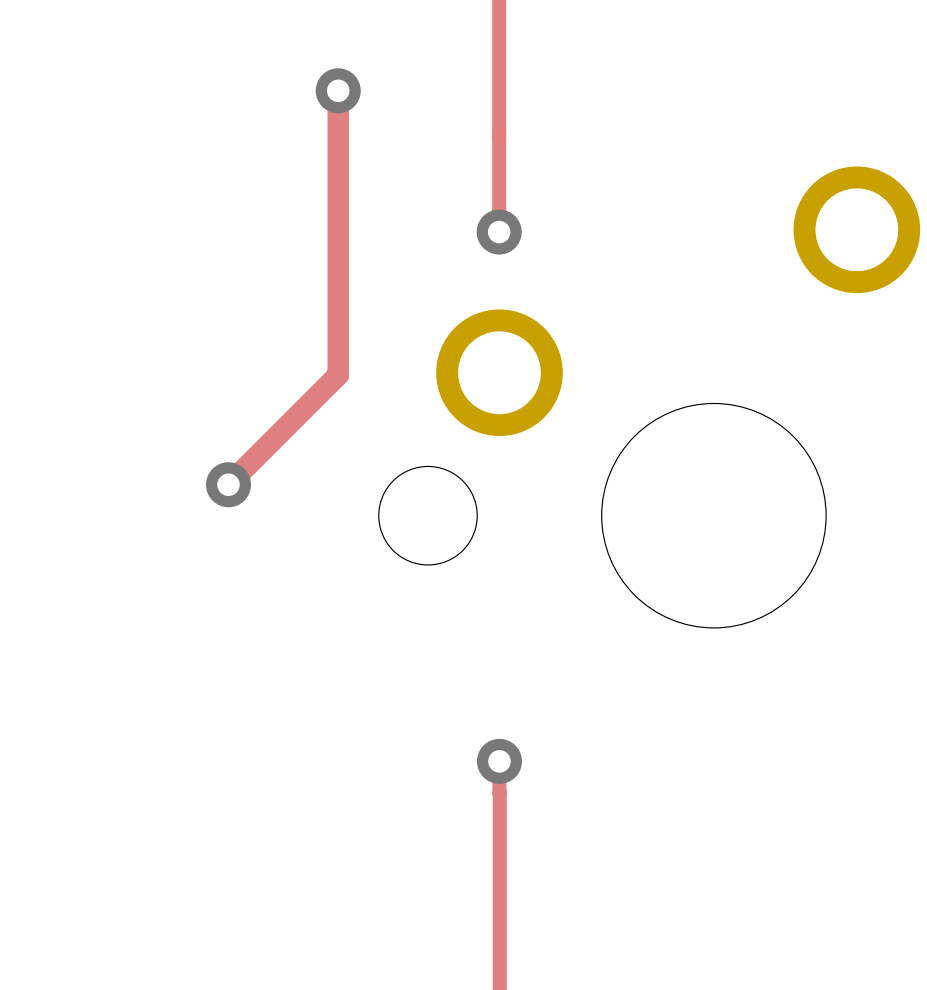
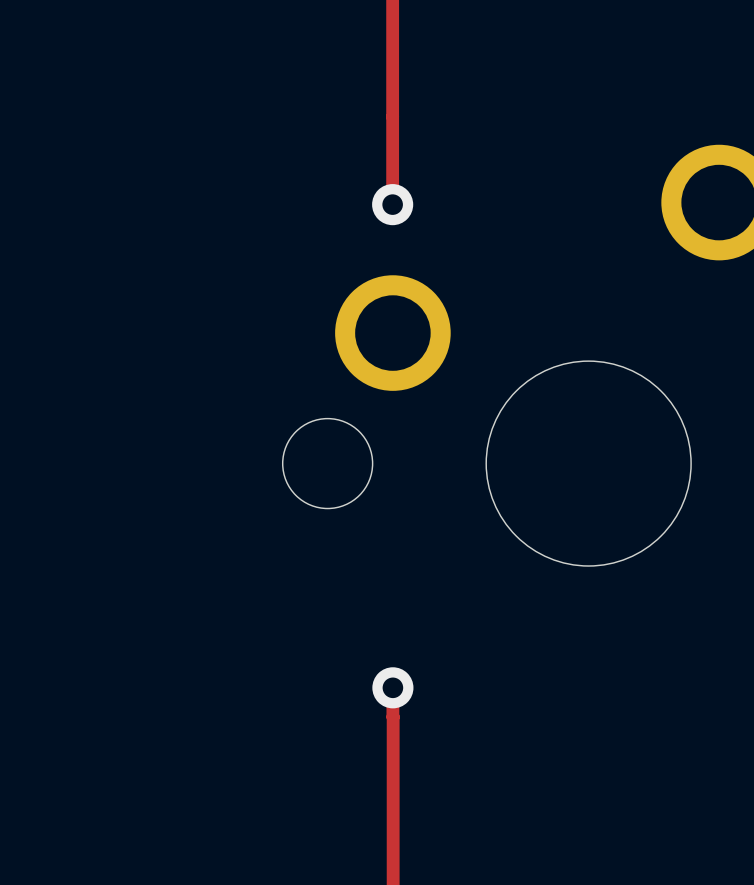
track: (338, 90) (338, 375) (228, 484) -> none
via: (338, 90) -> none
via: (228, 484) -> none

